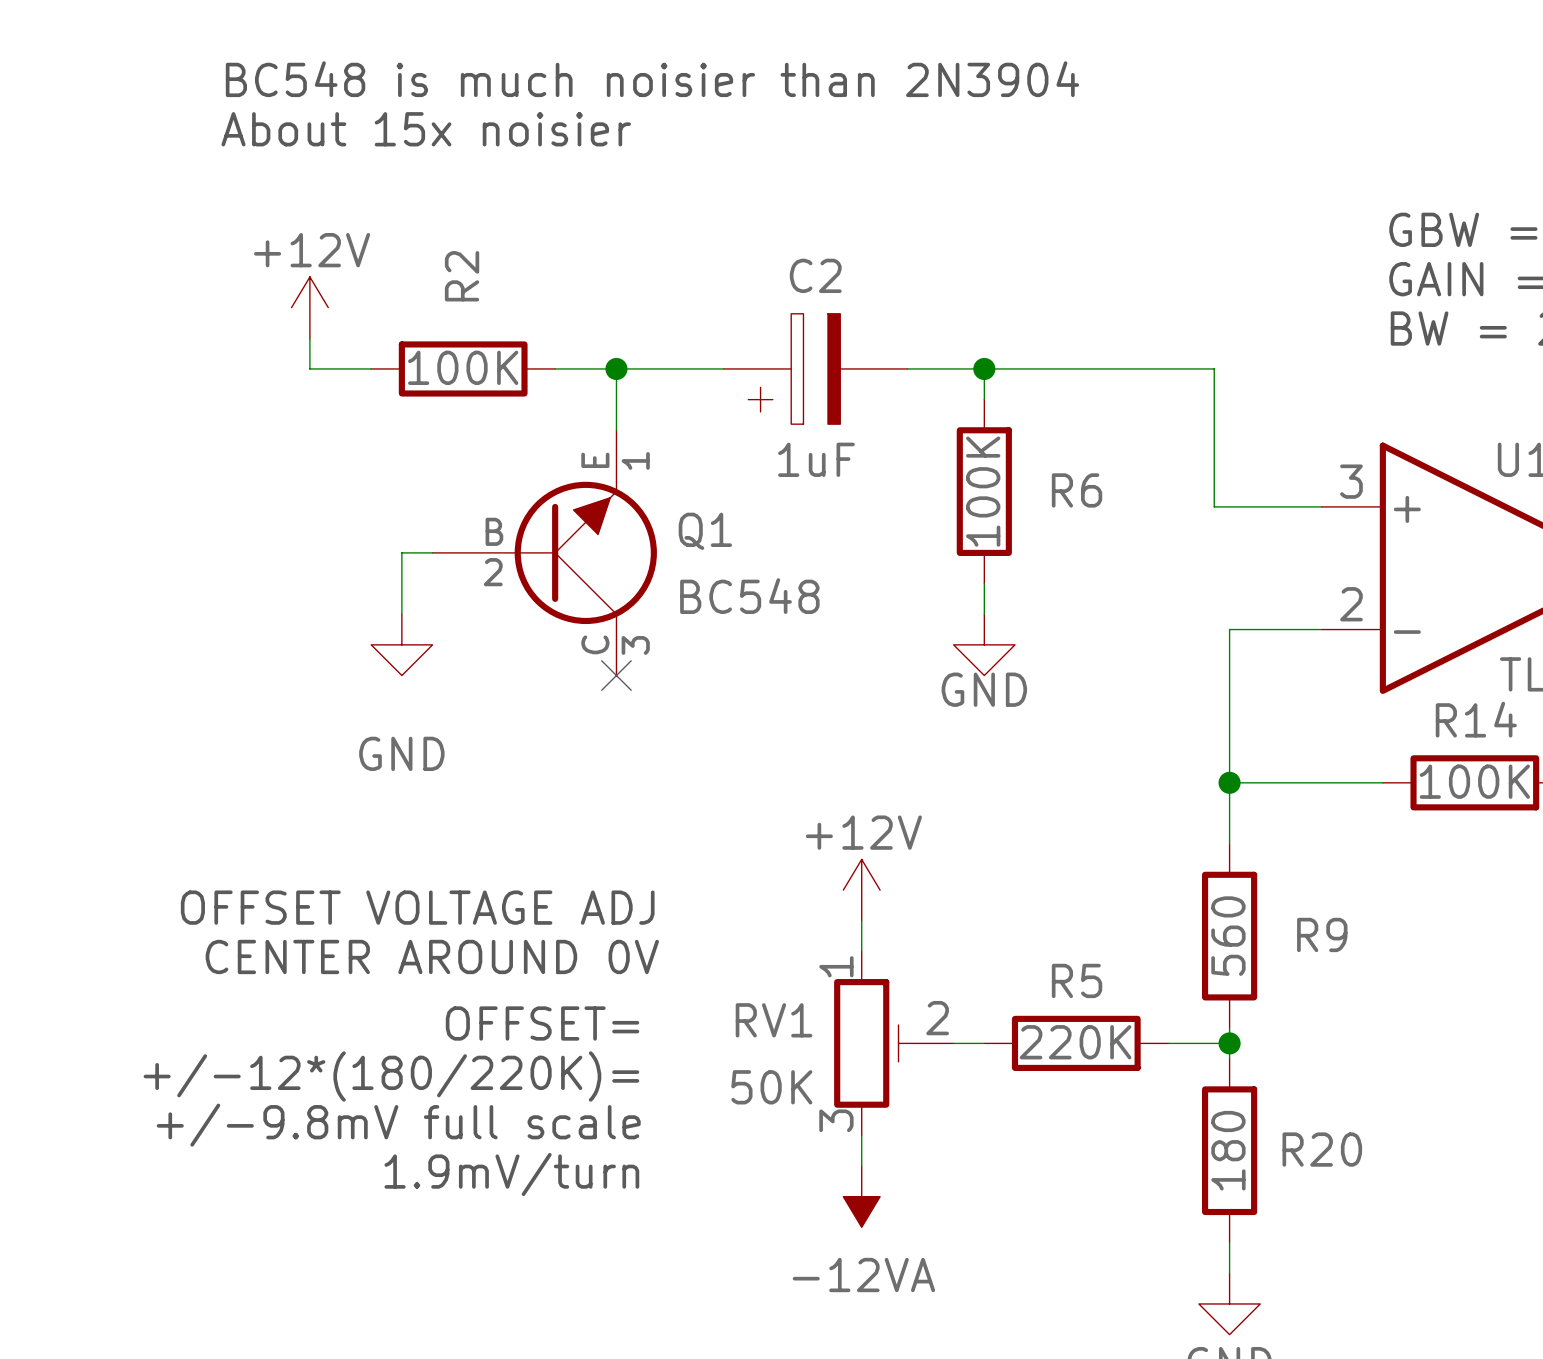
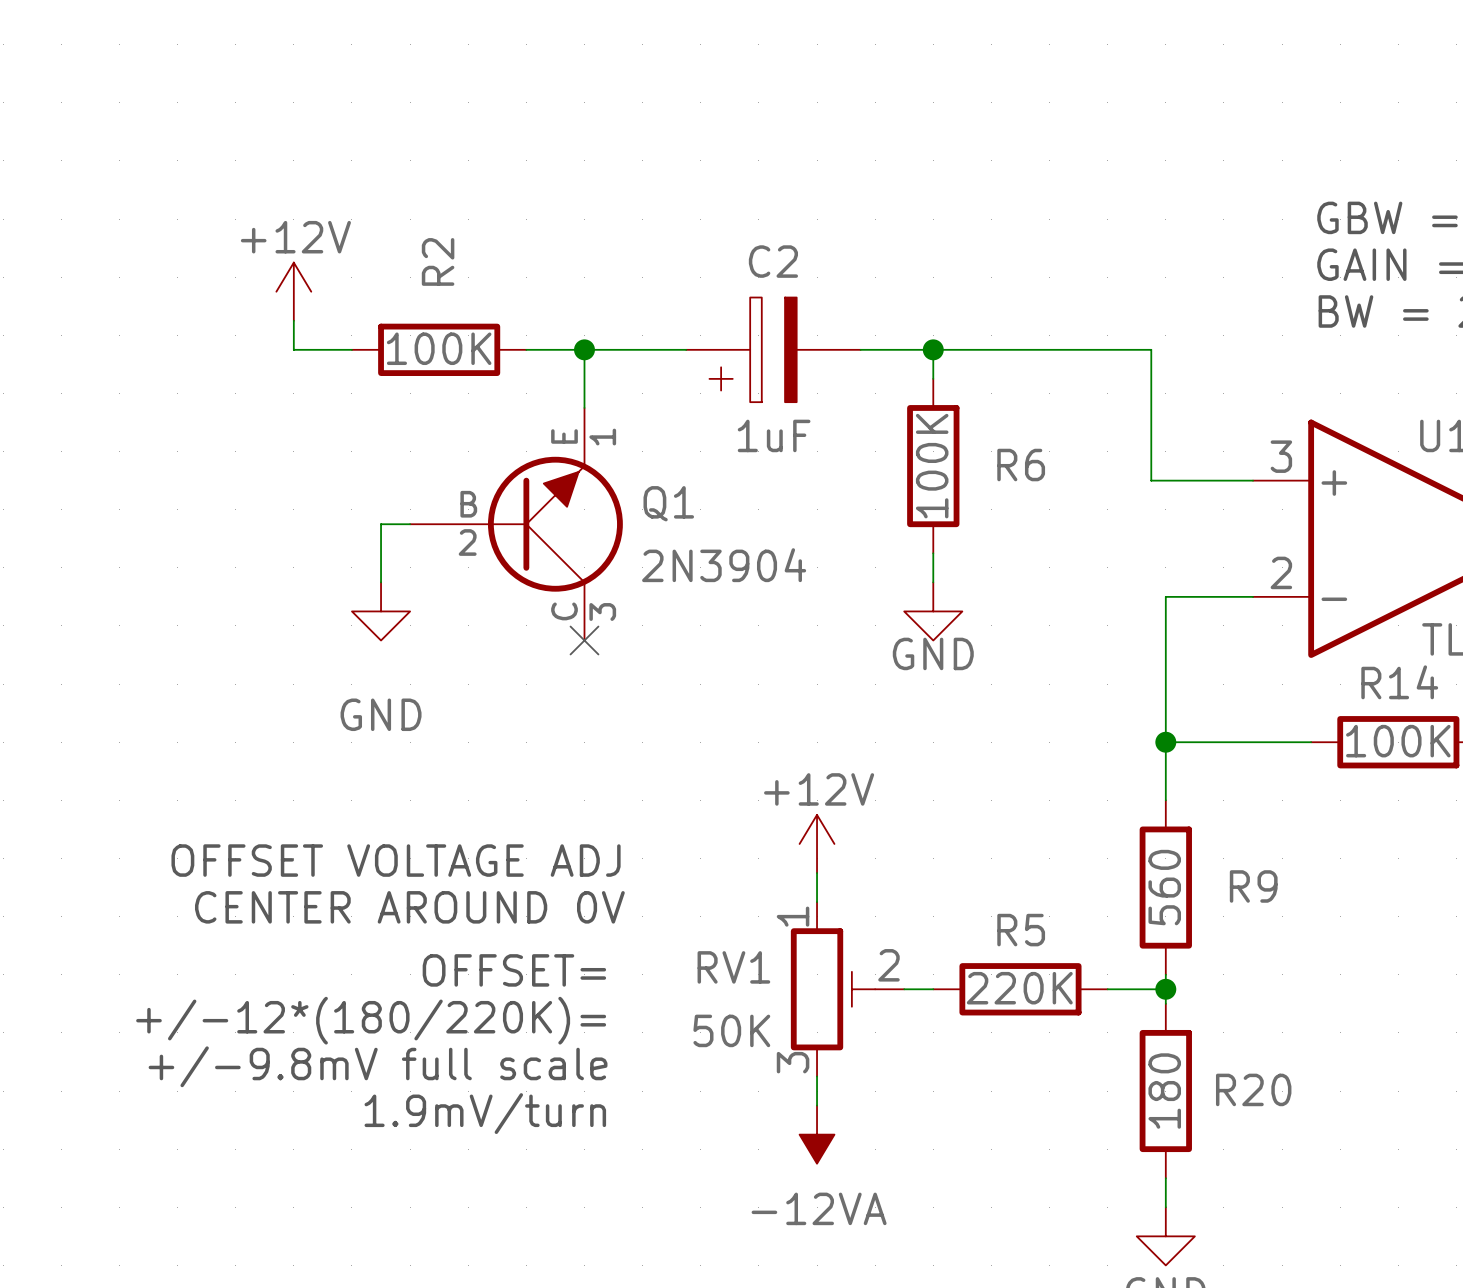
text: BC548 is much noisier than 2N3904 (652, 79) -> none
text: About 15x noisier (426, 129) -> none
Q1 value: BC548 (749, 596) -> 2N3904 (724, 565)

